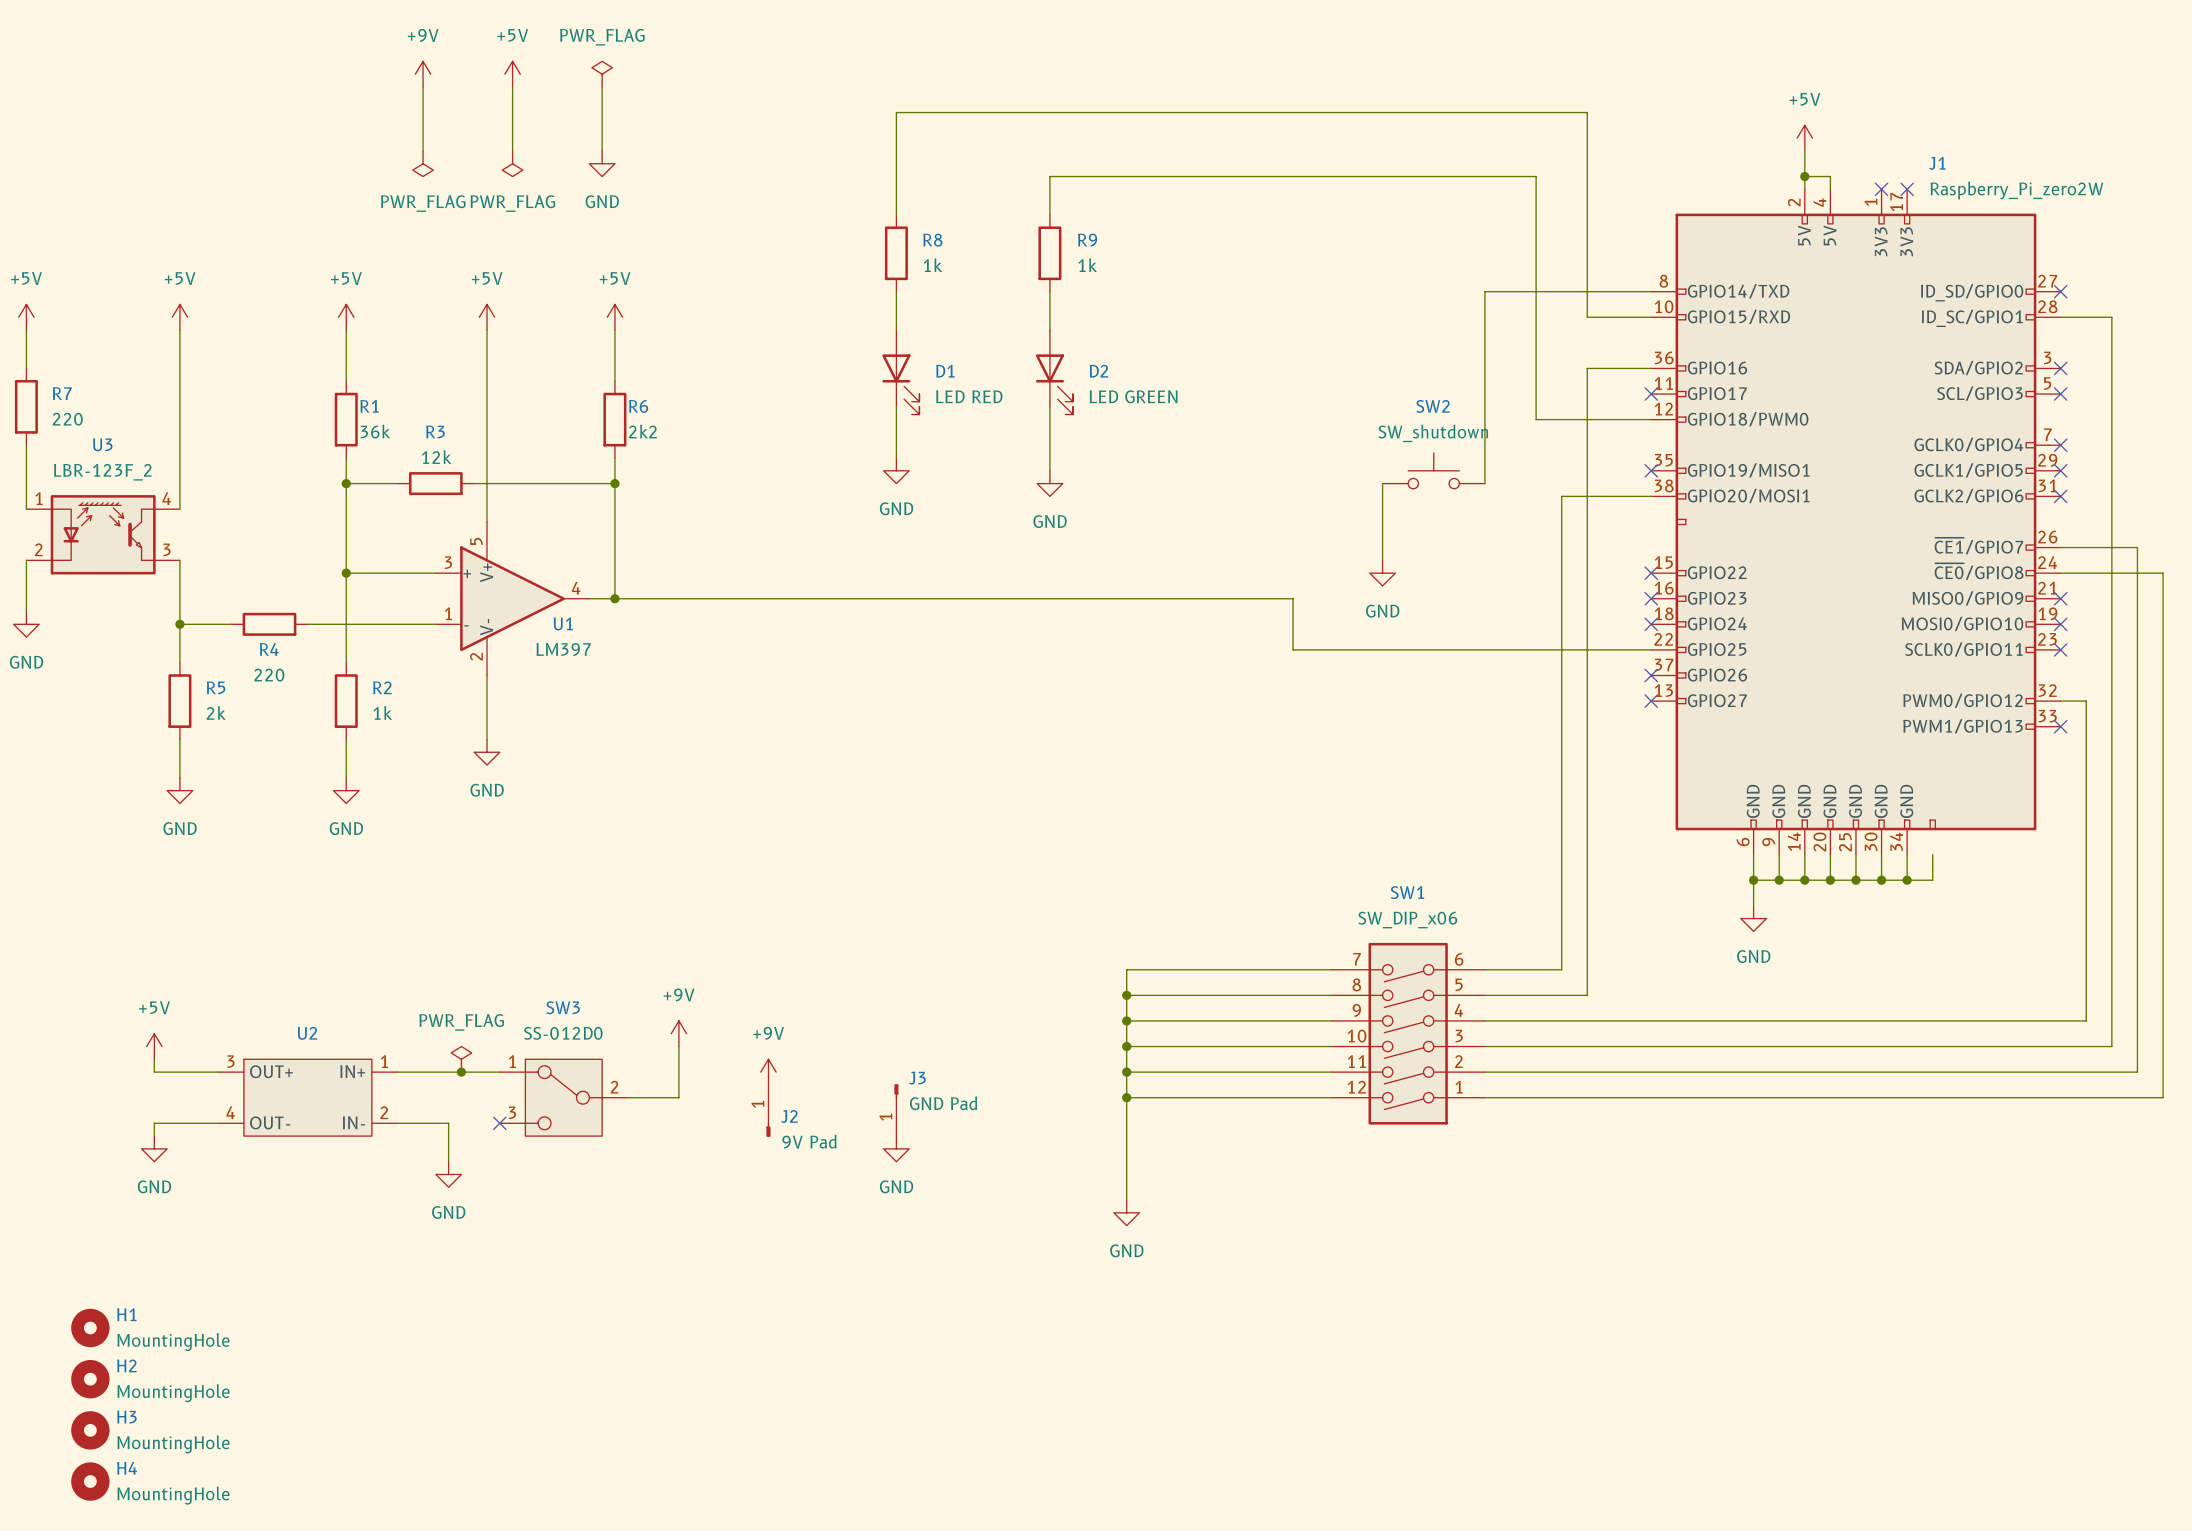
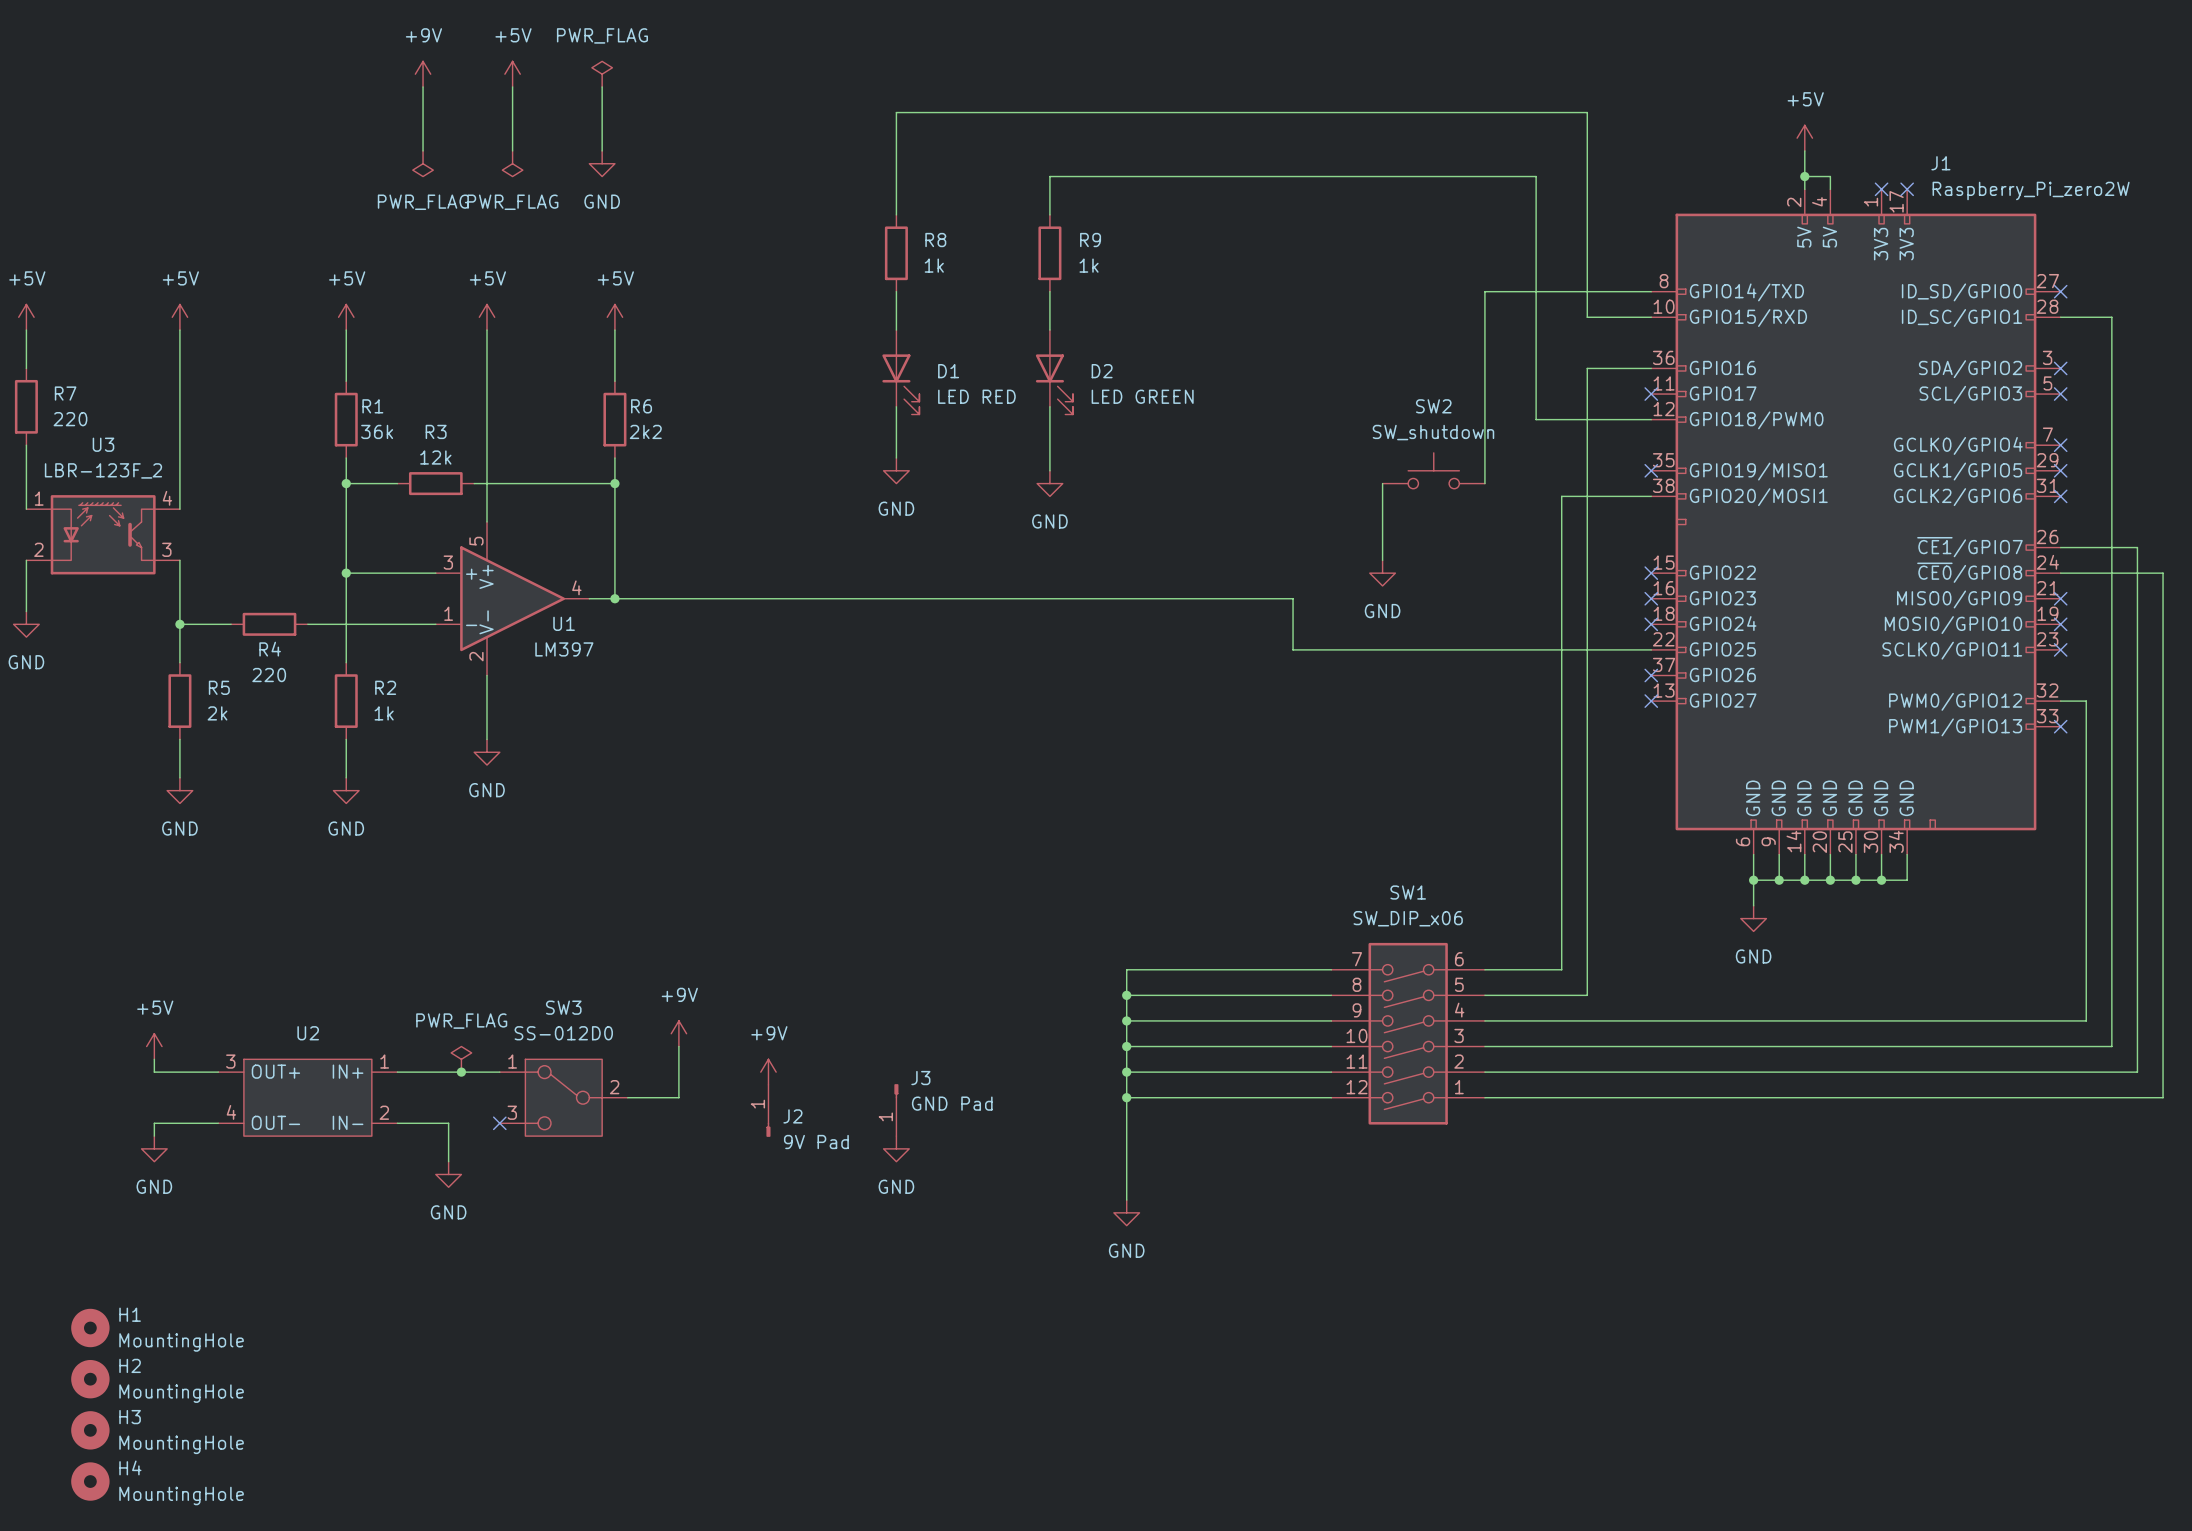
wire: (1932, 854) (1932, 880) (1907, 880) -> none
junction: (1907, 880) -> none

